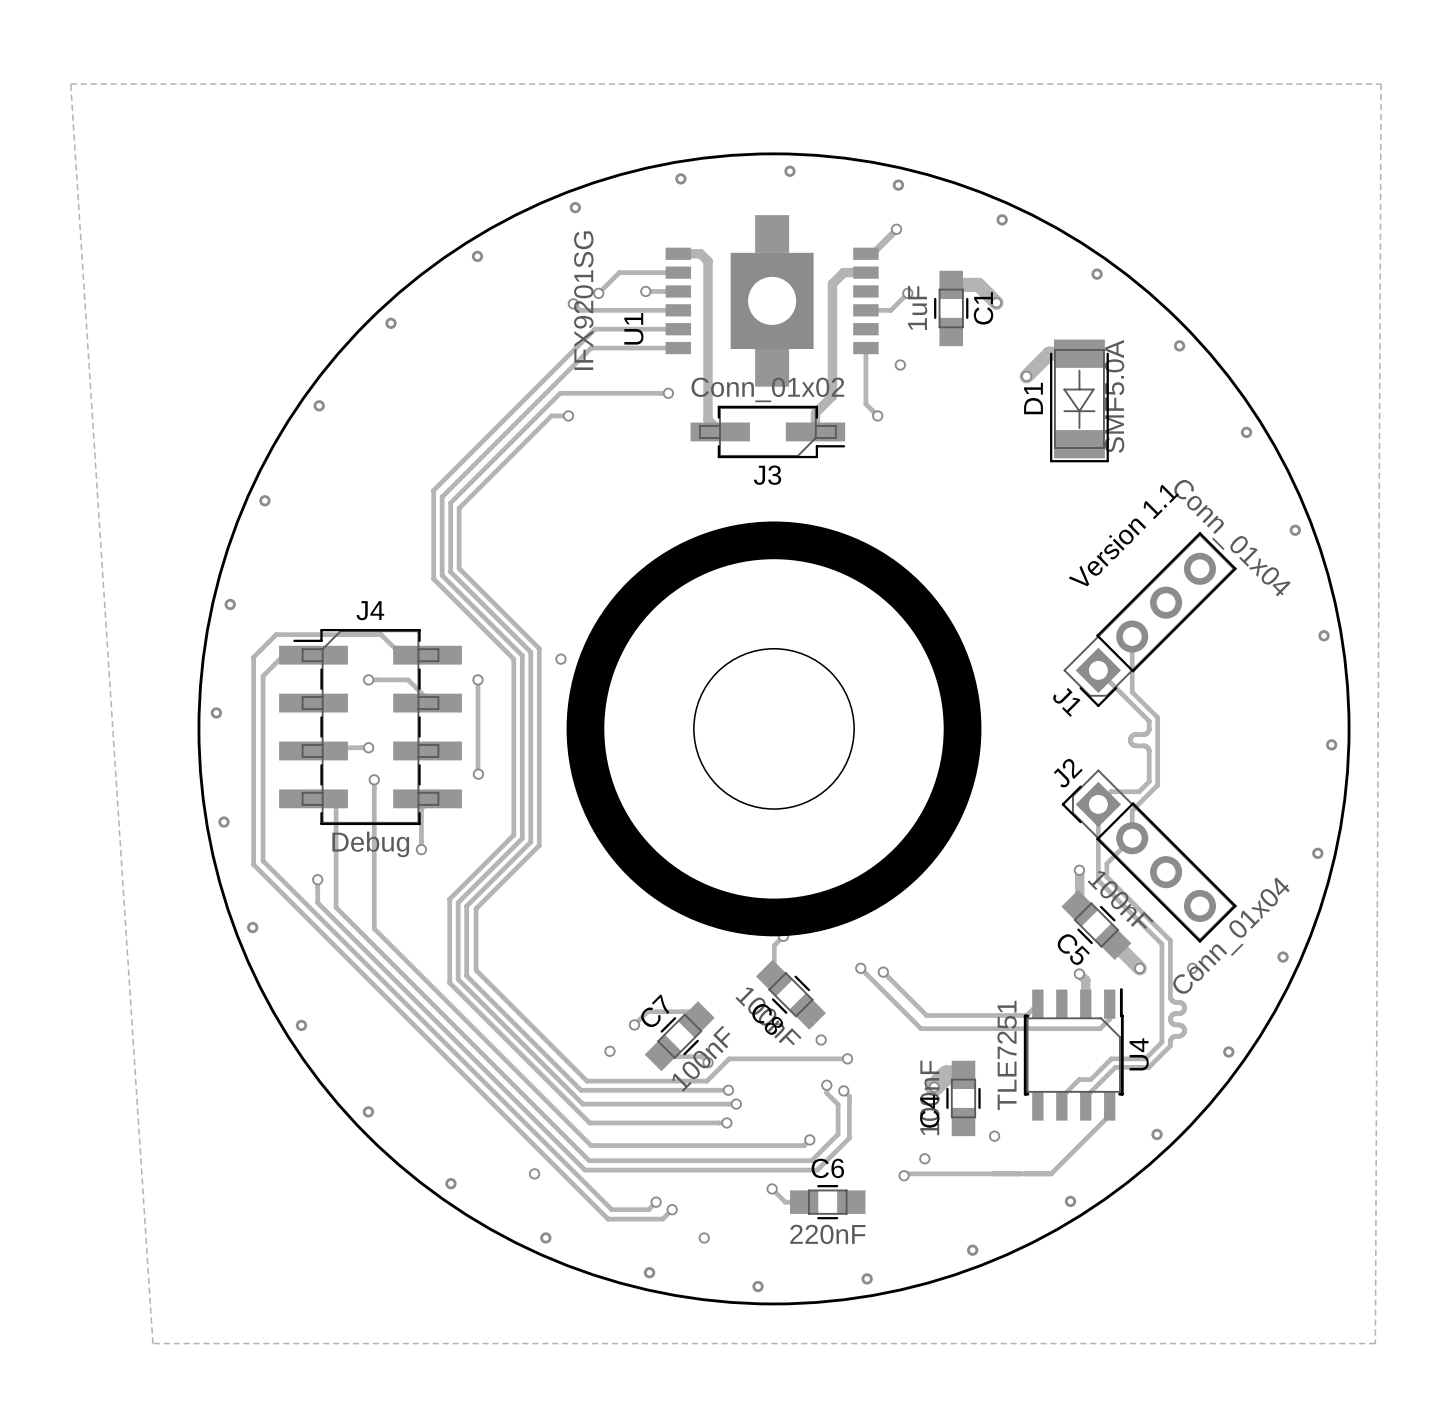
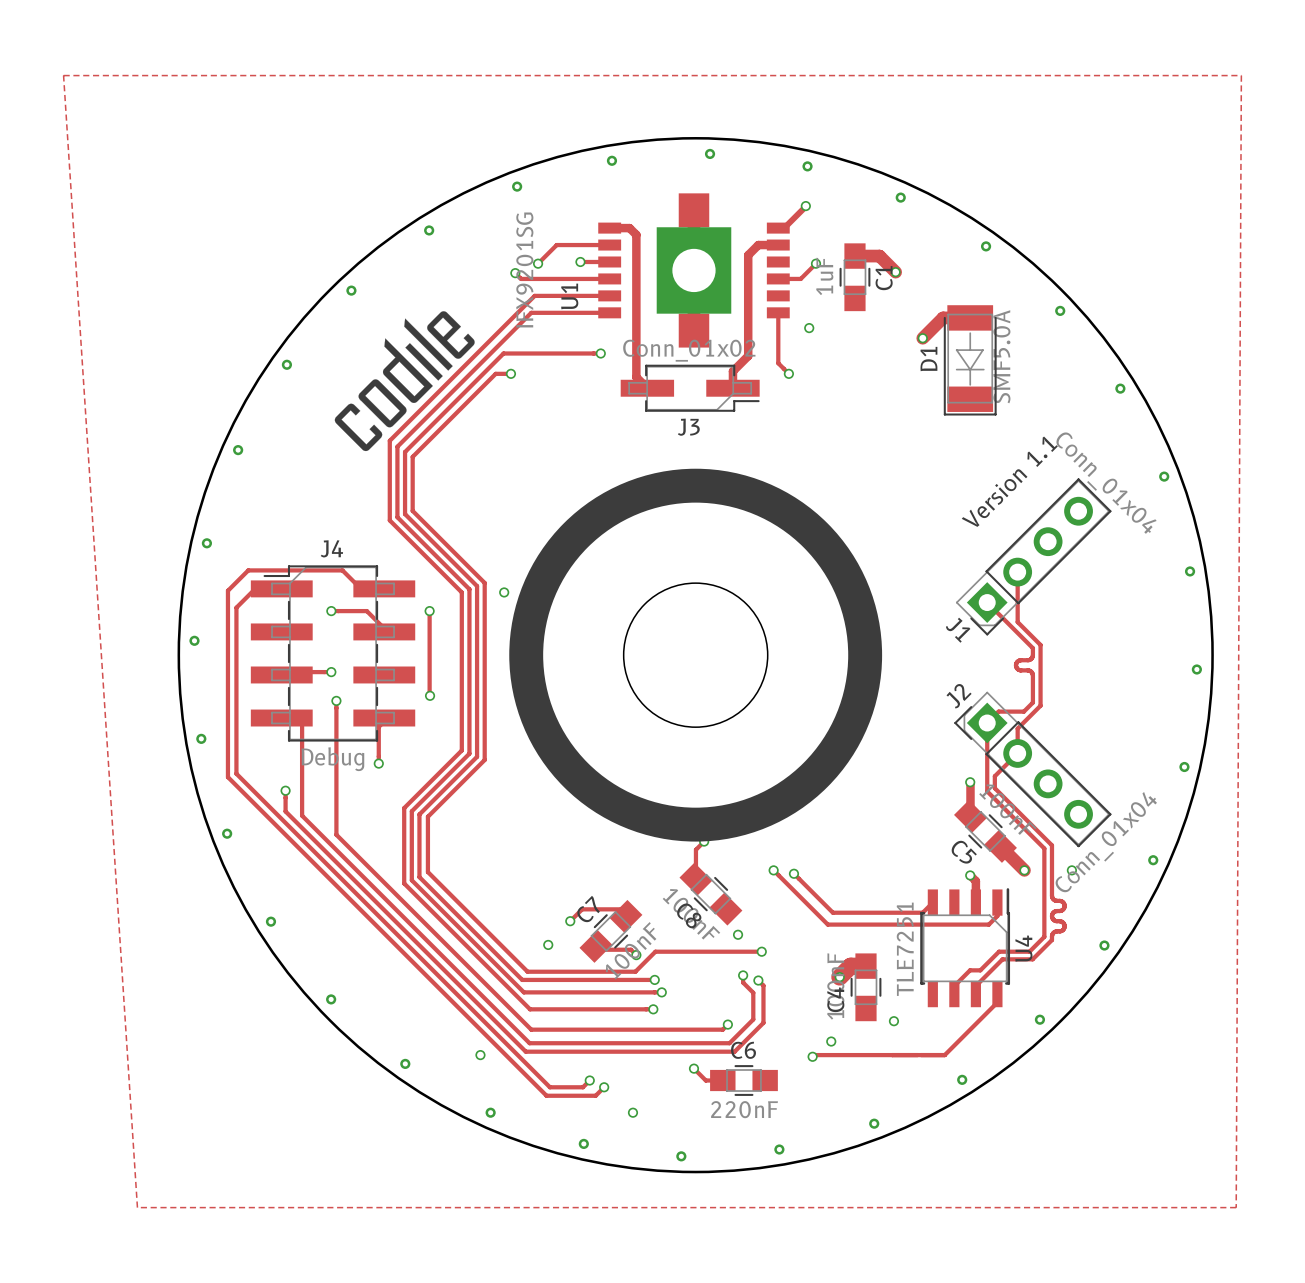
drawing: none -> [334, 311, 475, 452]

